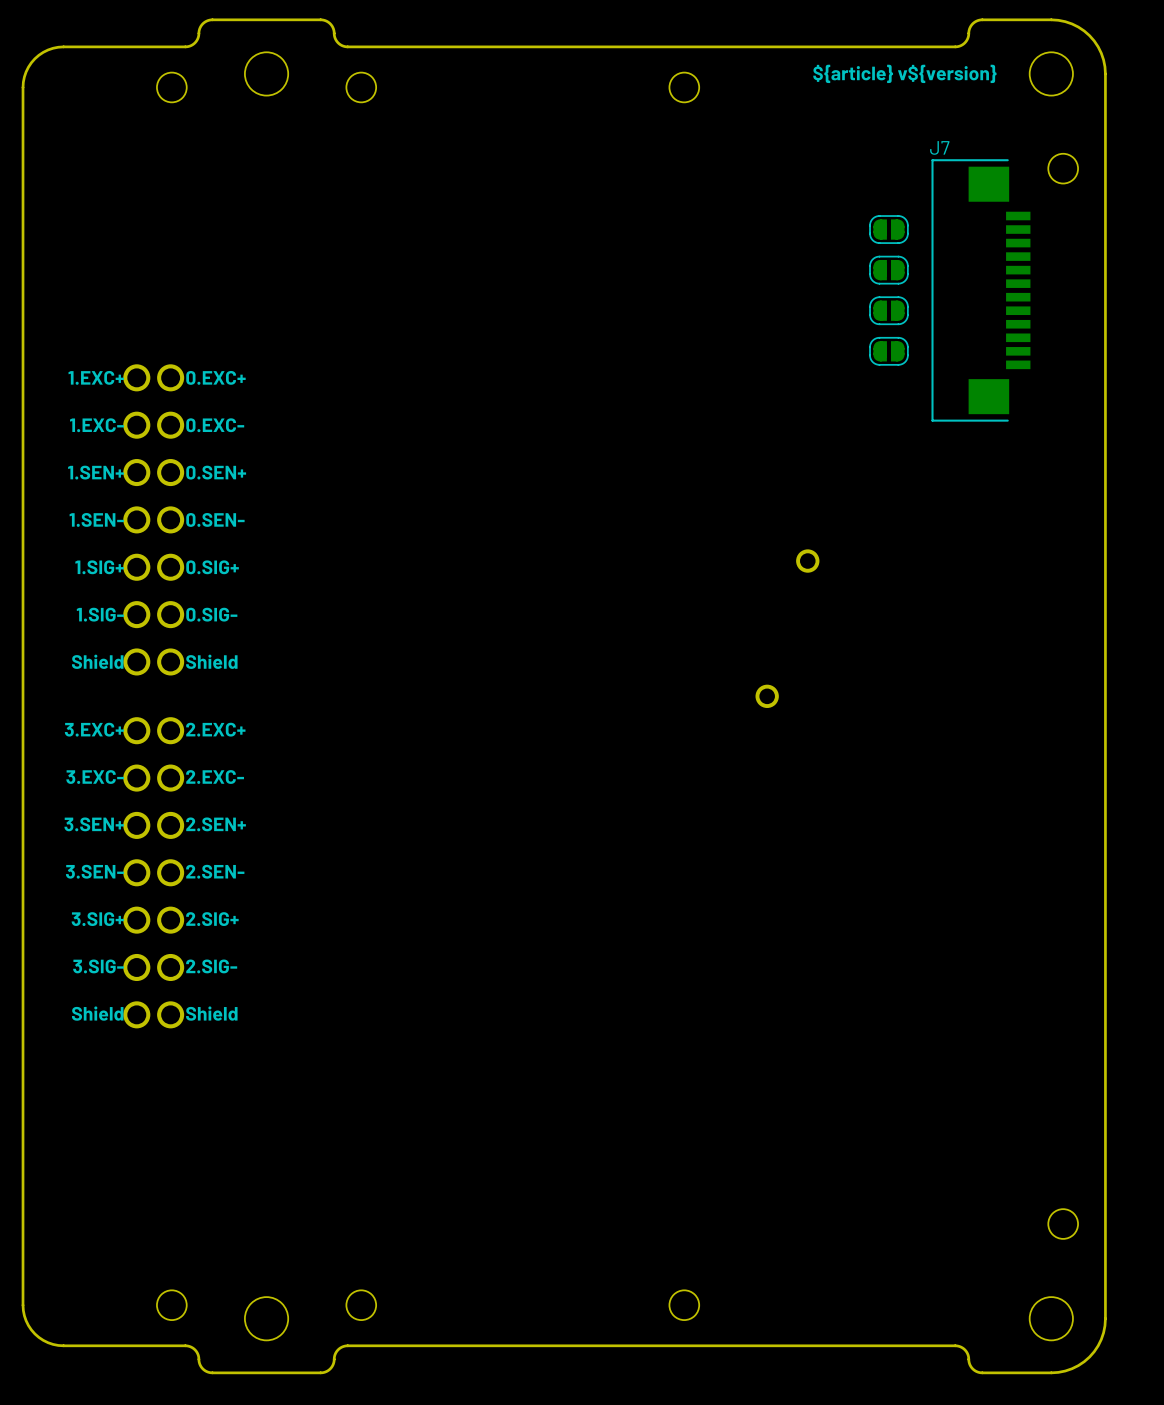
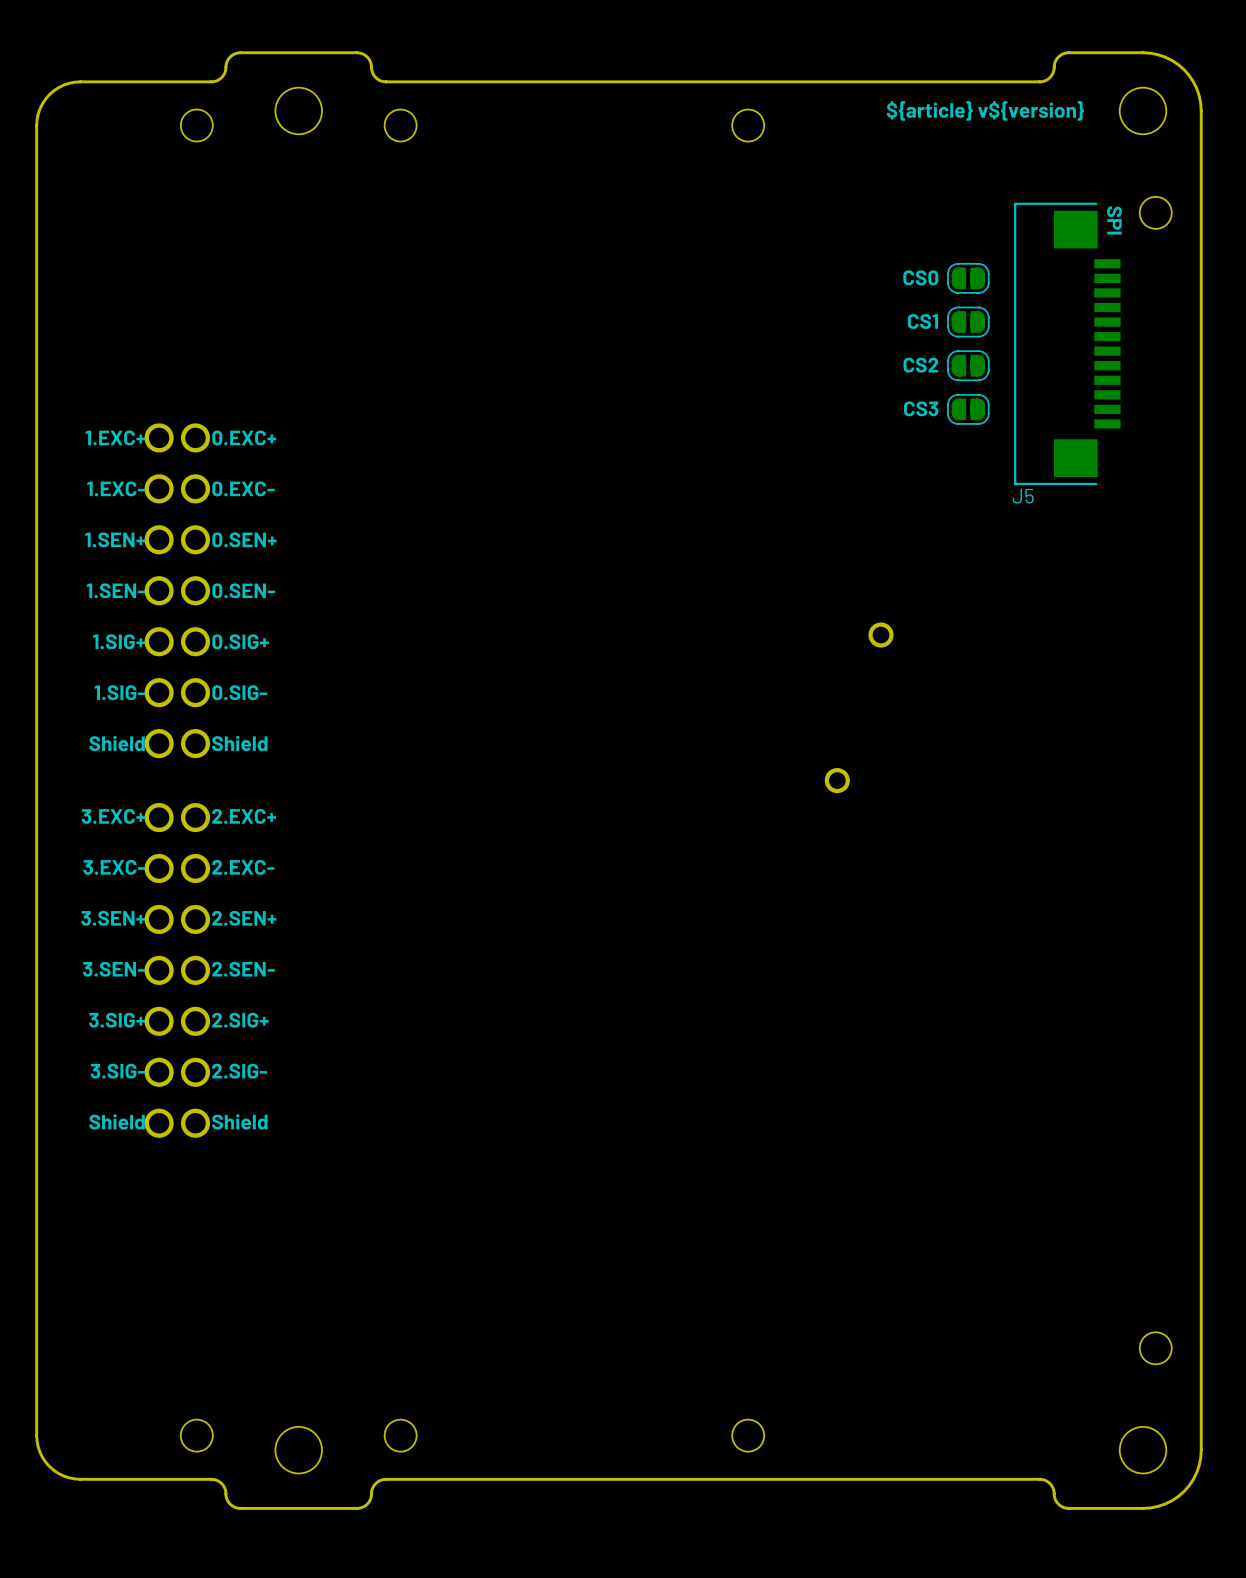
J7 name: J7 (939, 147) -> J5 (1023, 496)
text: none -> SPI (1114, 220)
text: none -> CS0 (920, 277)
text: none -> CS1 (922, 321)
text: none -> CS2 (920, 365)
text: none -> CS3 (921, 408)

